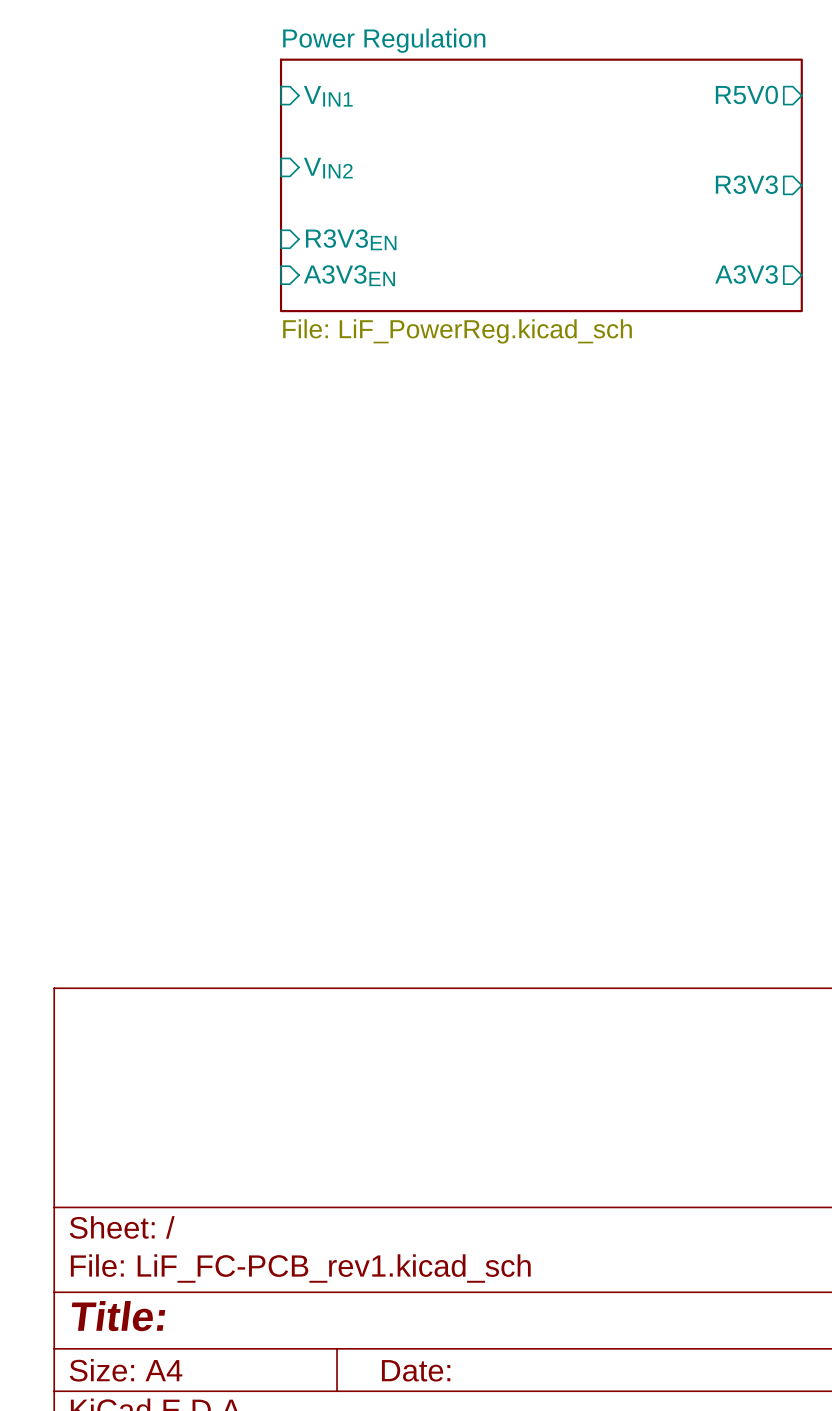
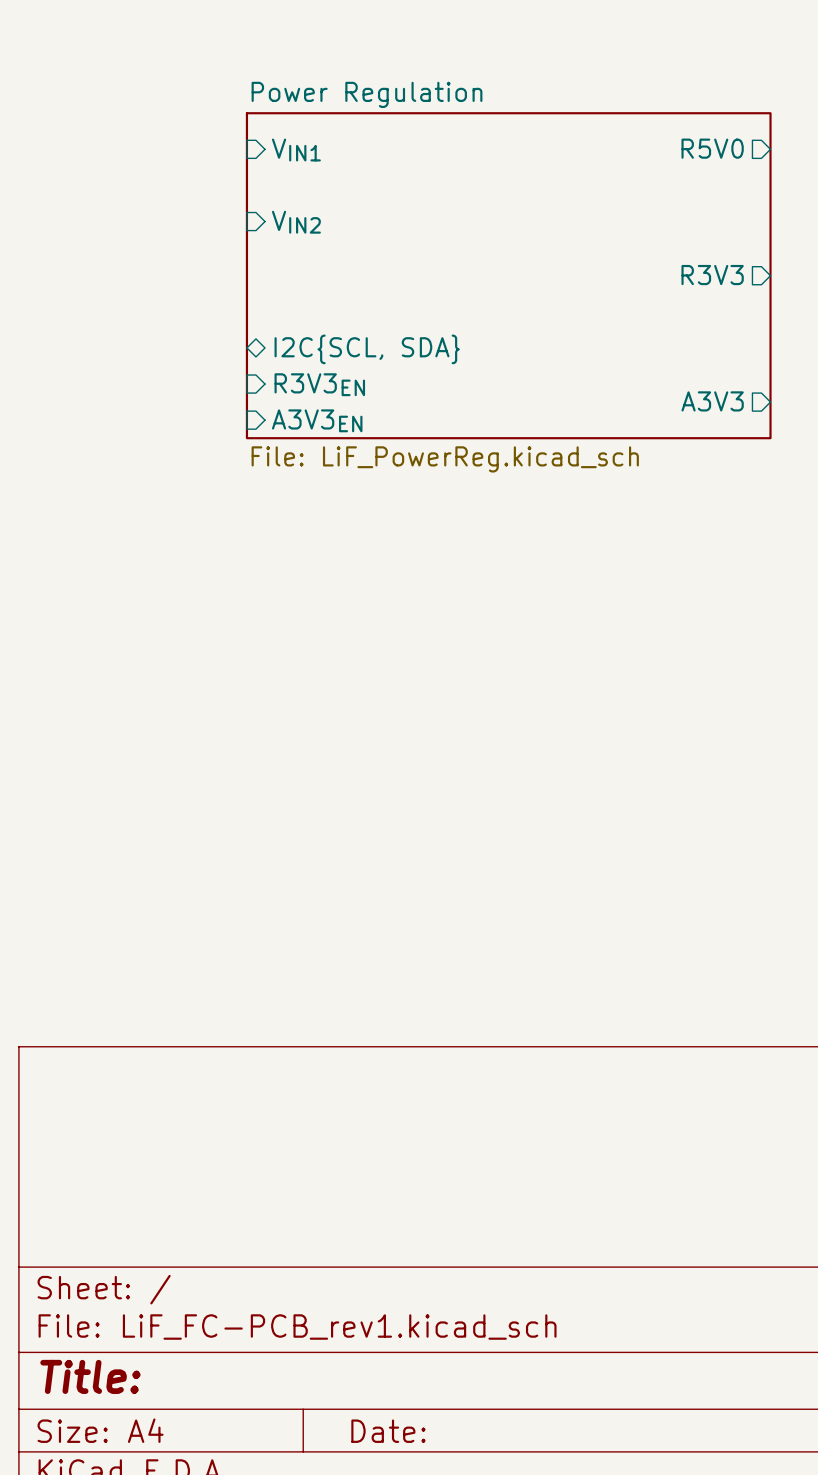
sheet pin position: R3V3 (746, 184) -> R3V3 (712, 275)
sheet Power Regulation: File: LiF_PowerReg.kicad_sch (541, 185) -> none
sheet Power Regulation: none -> File: LiF_PowerReg.kicad_sch (508, 275)
sheet pin position: R3V3EN (351, 239) -> R3V3EN (319, 384)
sheet pin position: A3V3 (746, 274) -> A3V3 (712, 401)
sheet pin position: A3V3EN (349, 275) -> A3V3EN (317, 420)
sheet pin: none -> I2C{SCL, SDA} (367, 349)

